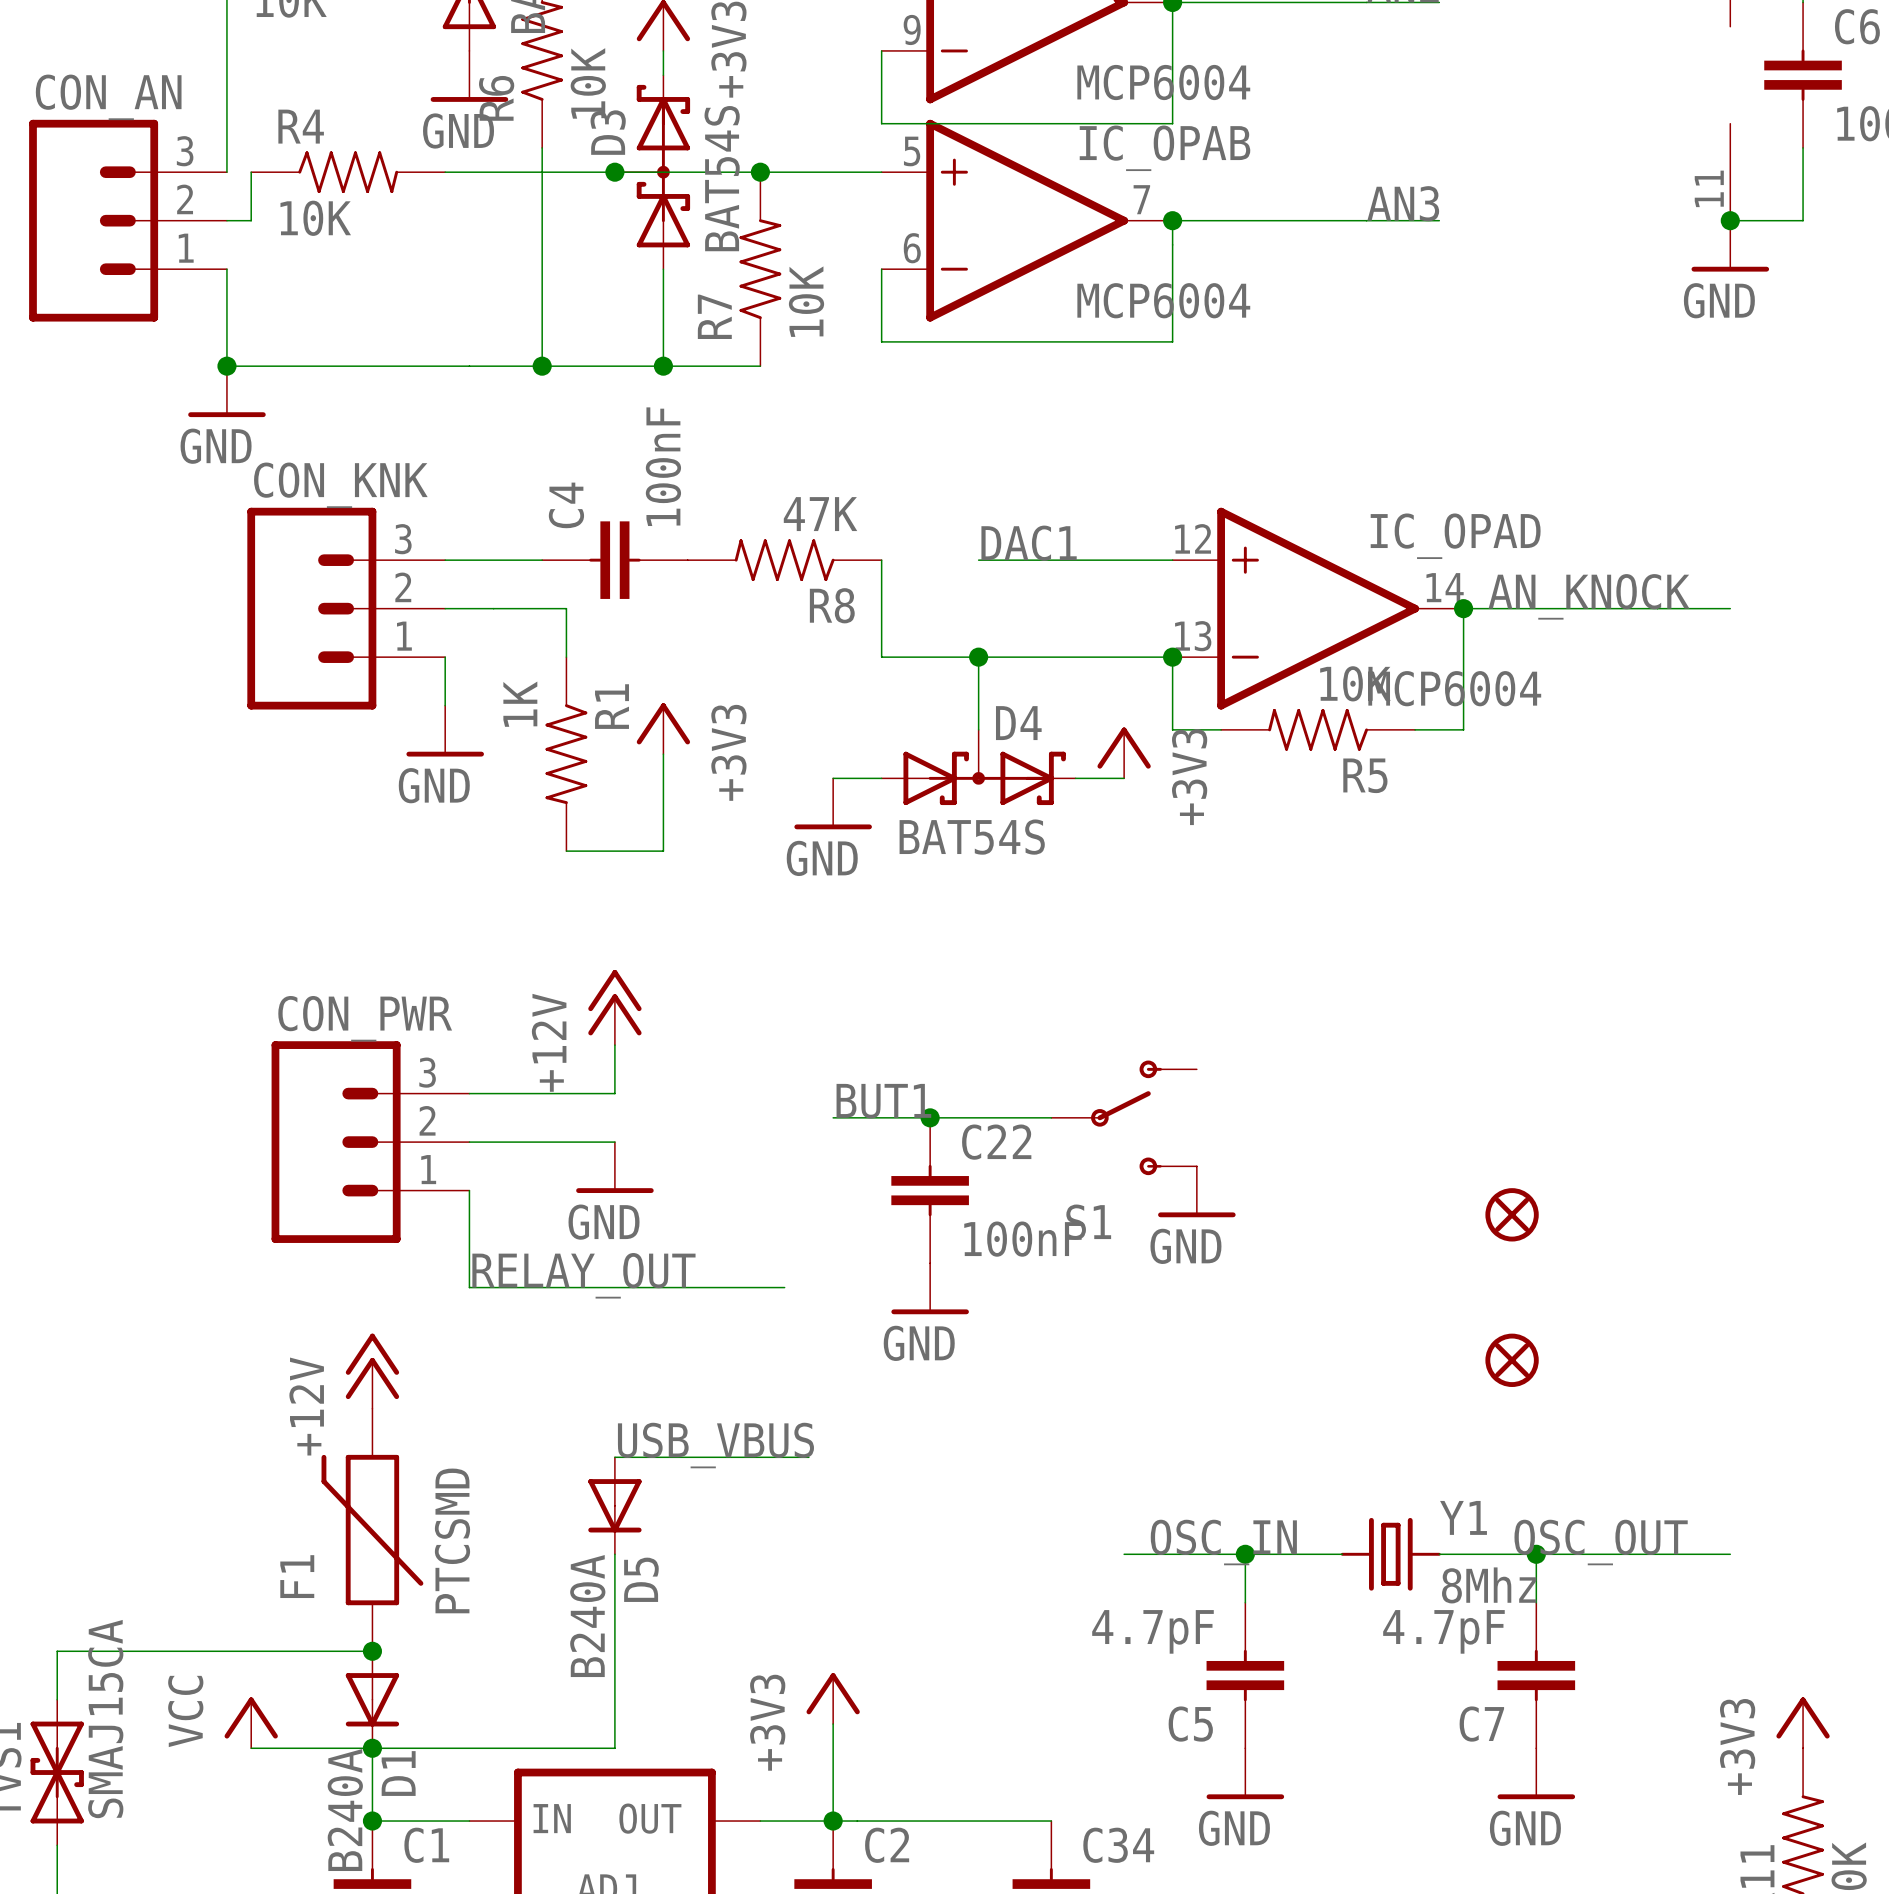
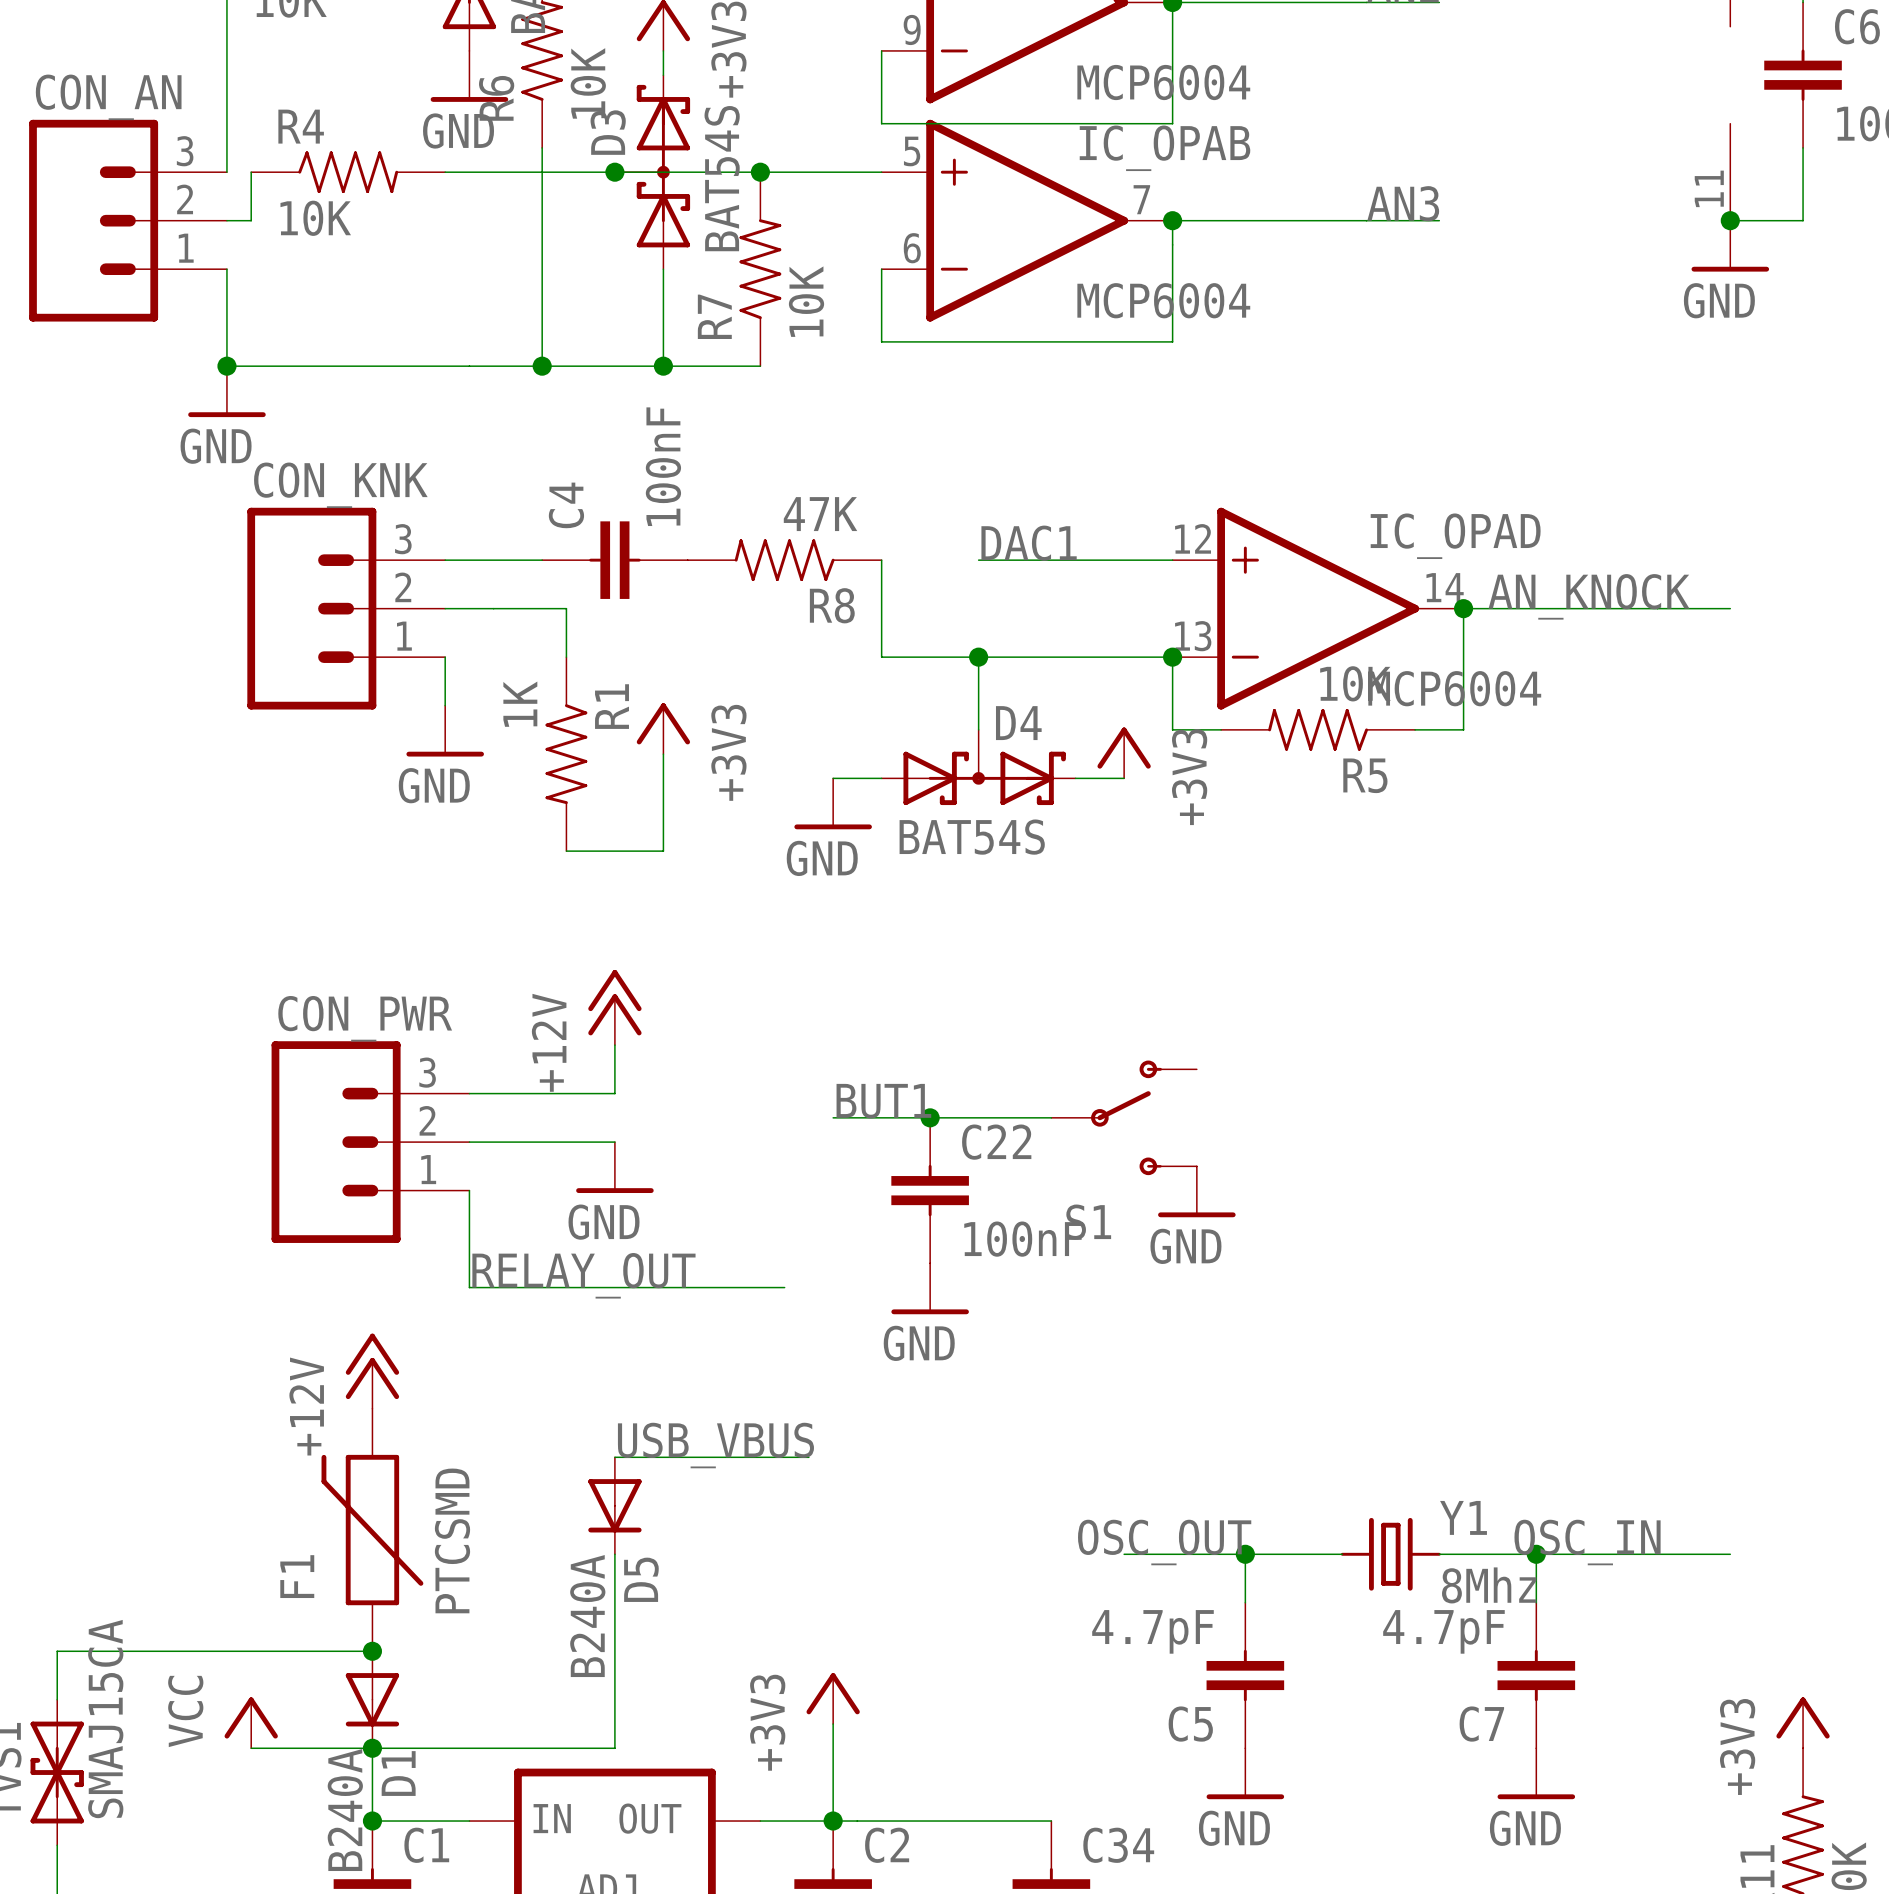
part: (1512, 1214) -> none
part: (1512, 1360) -> none
label: OSC_IN (1223, 1542) -> OSC_OUT (1164, 1542)
label: OSC_OUT (1601, 1542) -> OSC_IN (1587, 1542)

